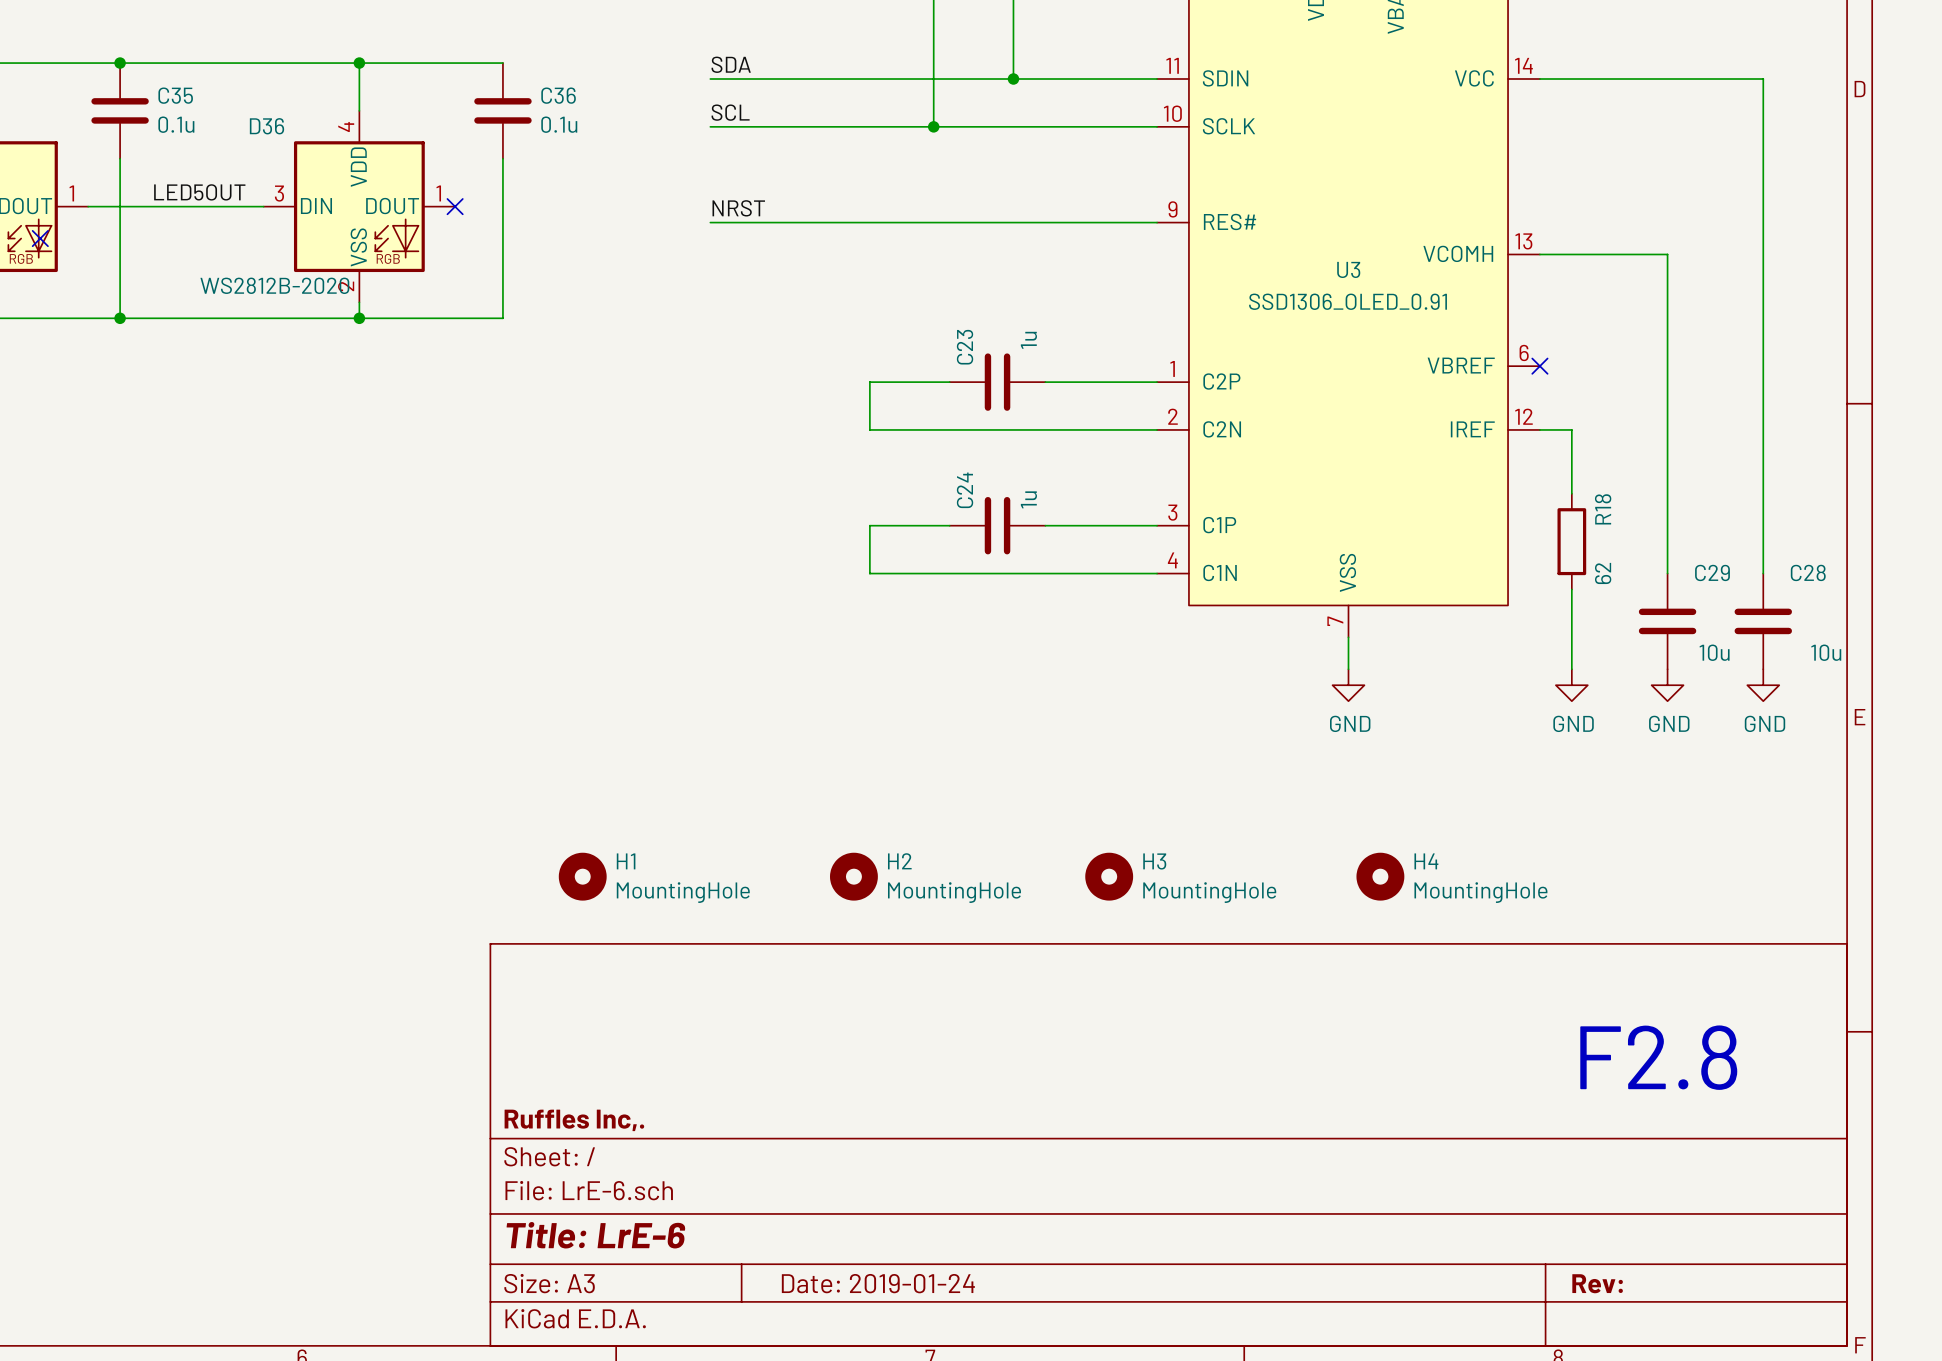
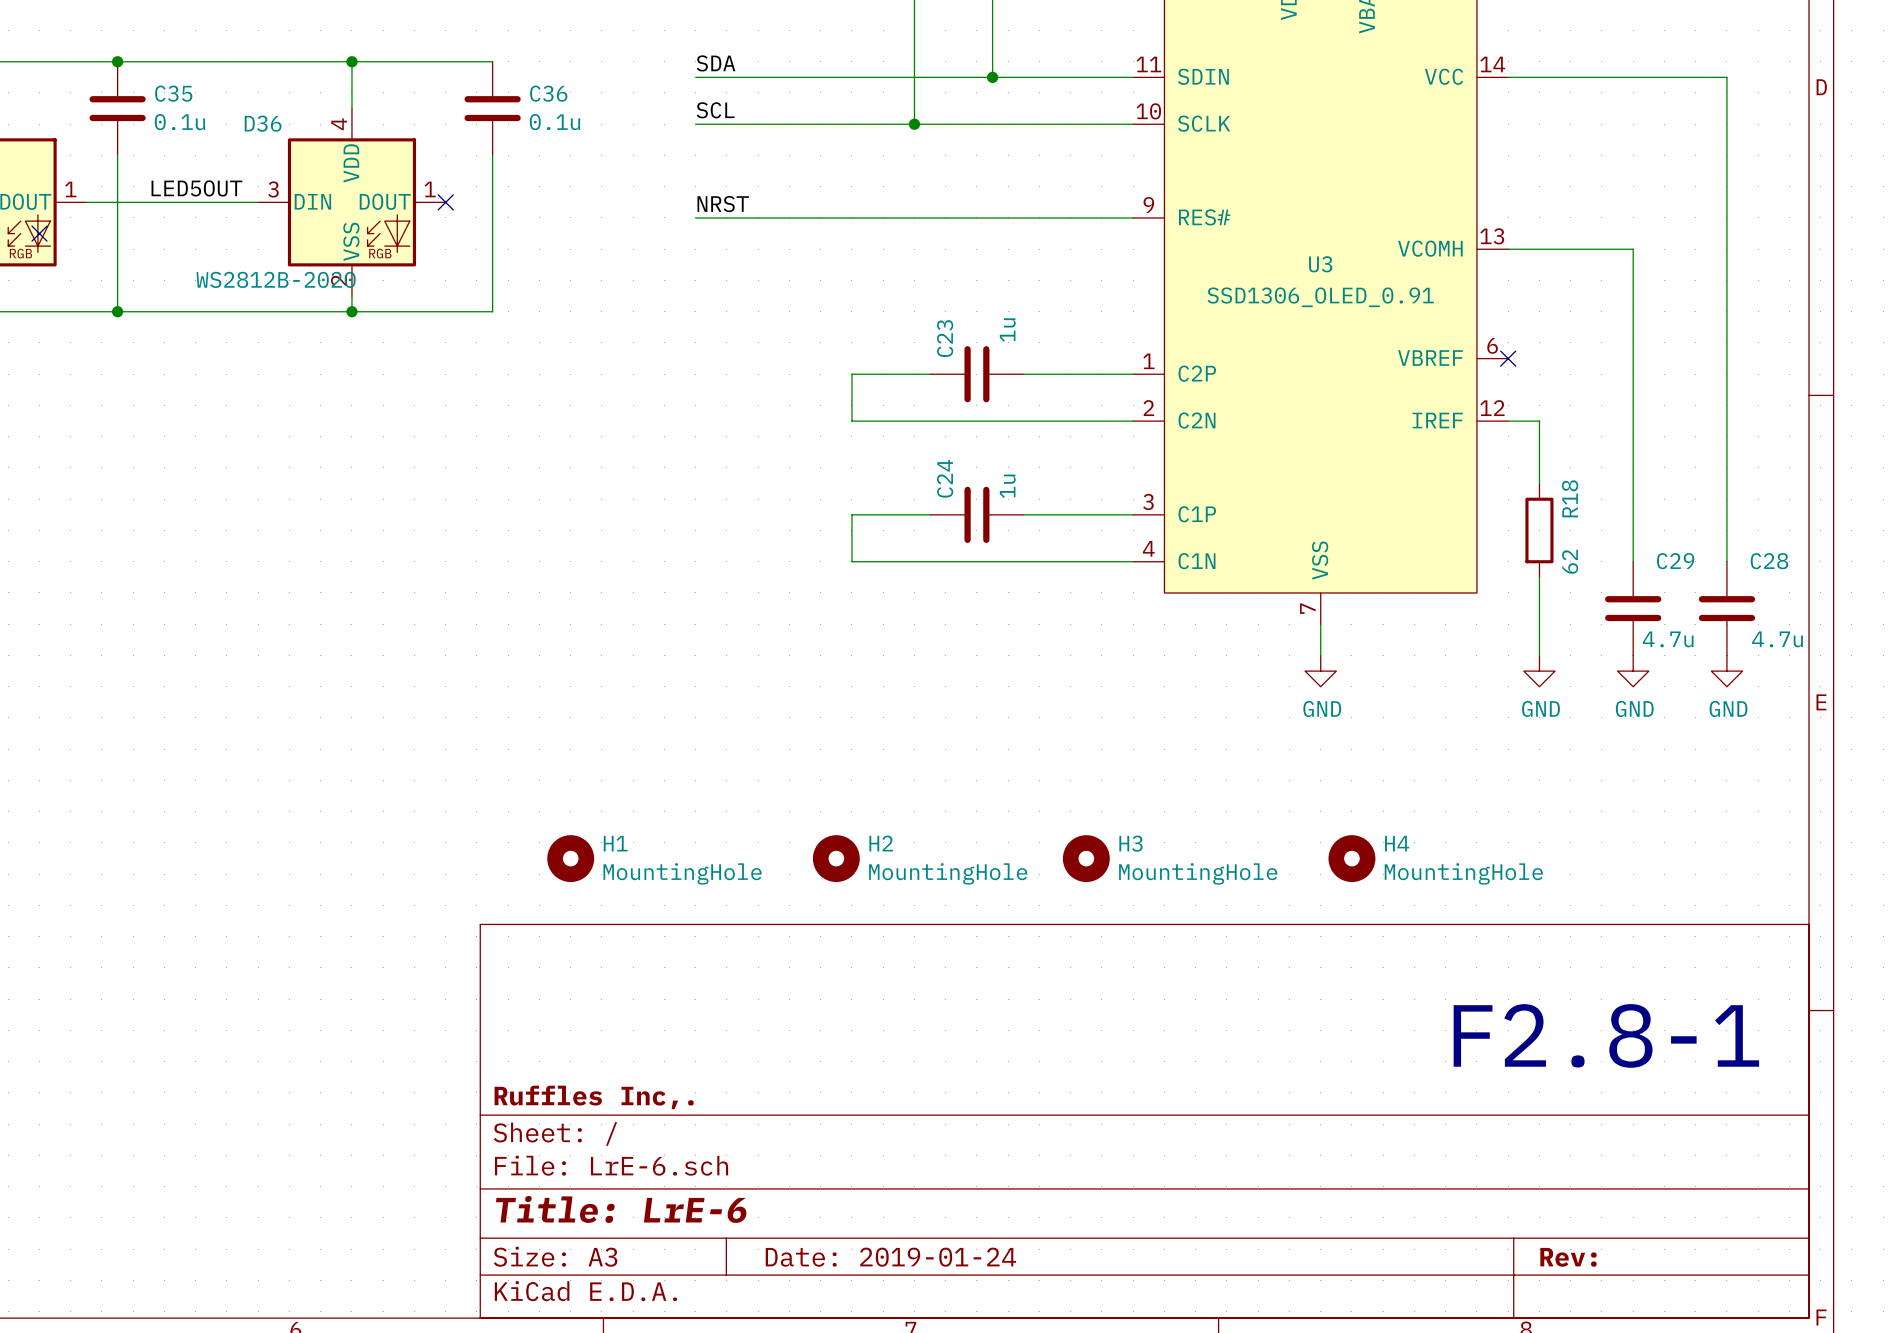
C29 value: 10u (1714, 652) -> 4.7u (1668, 639)
C28 value: 10u (1826, 652) -> 4.7u (1777, 639)
text: F2.8 (1658, 1057) -> F2.8-1 (1606, 1035)

